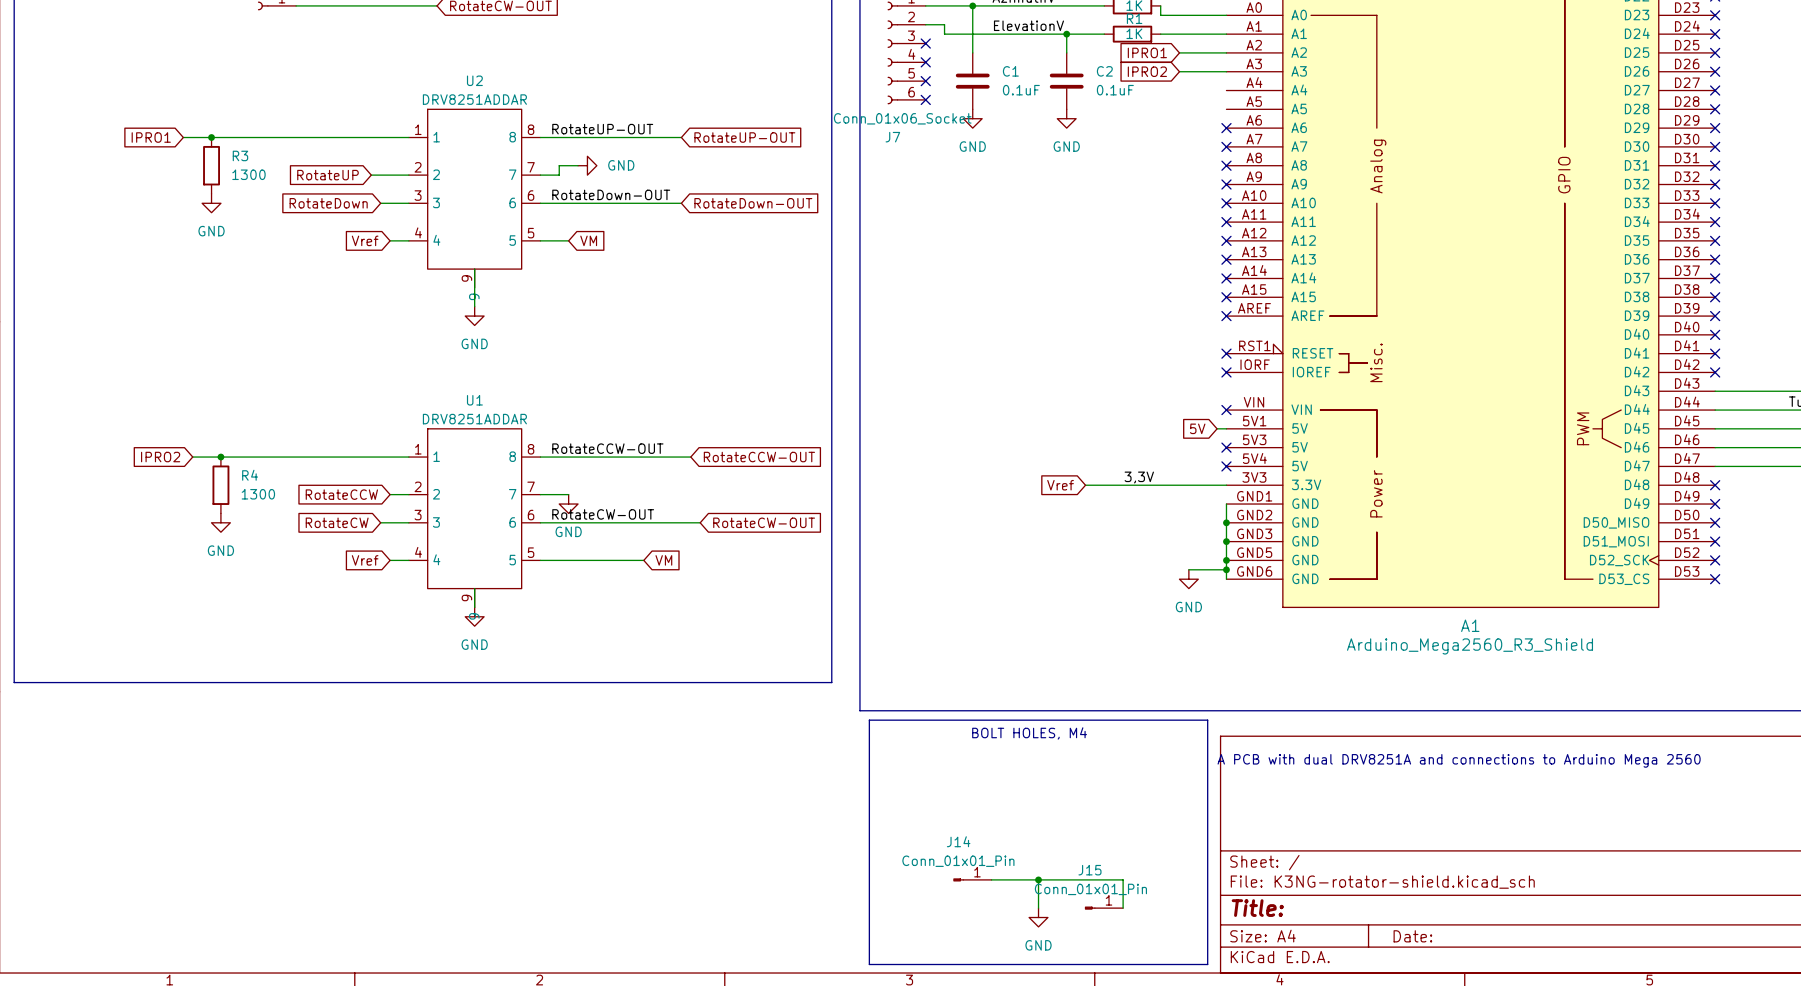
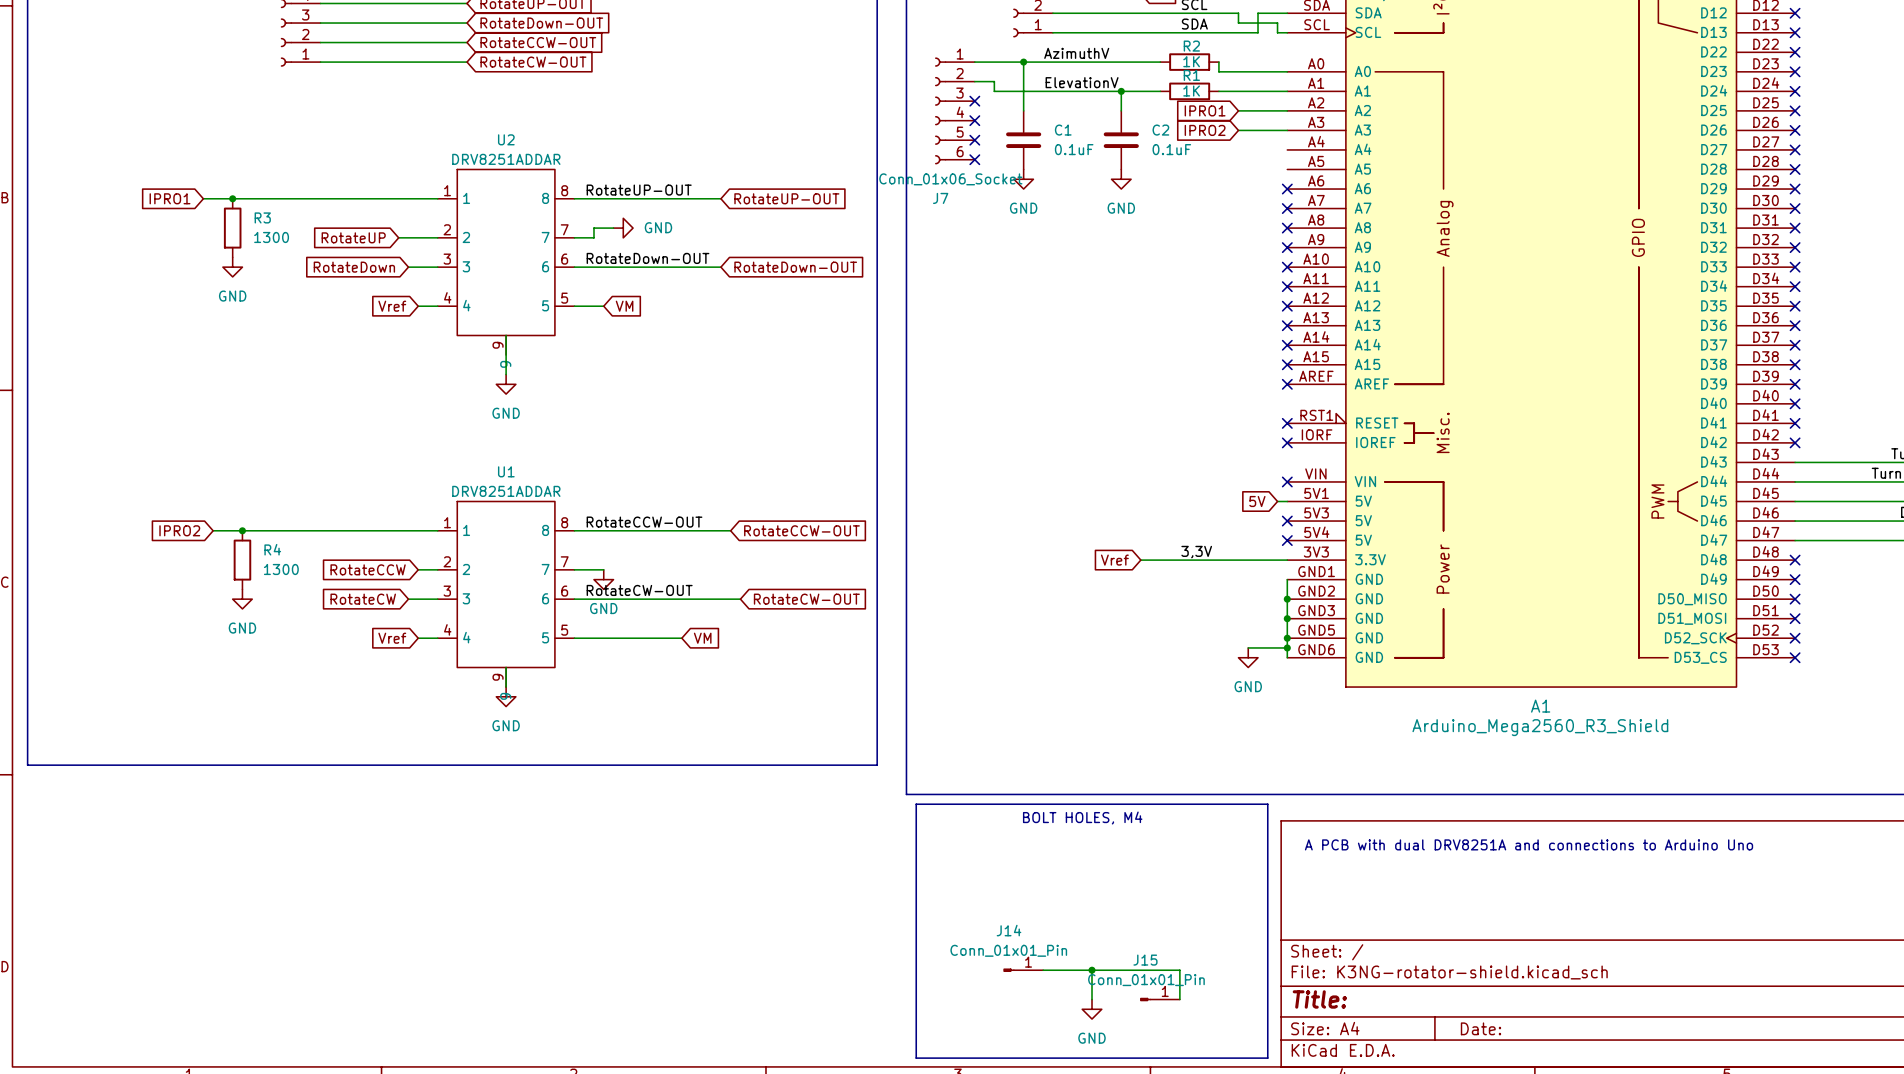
text: A PCB with dual DRV8251A and connections to Arduino Mega 2560 (1459, 760) -> A PCB with dual DRV8251A and connections to Arduino Uno (1529, 844)

